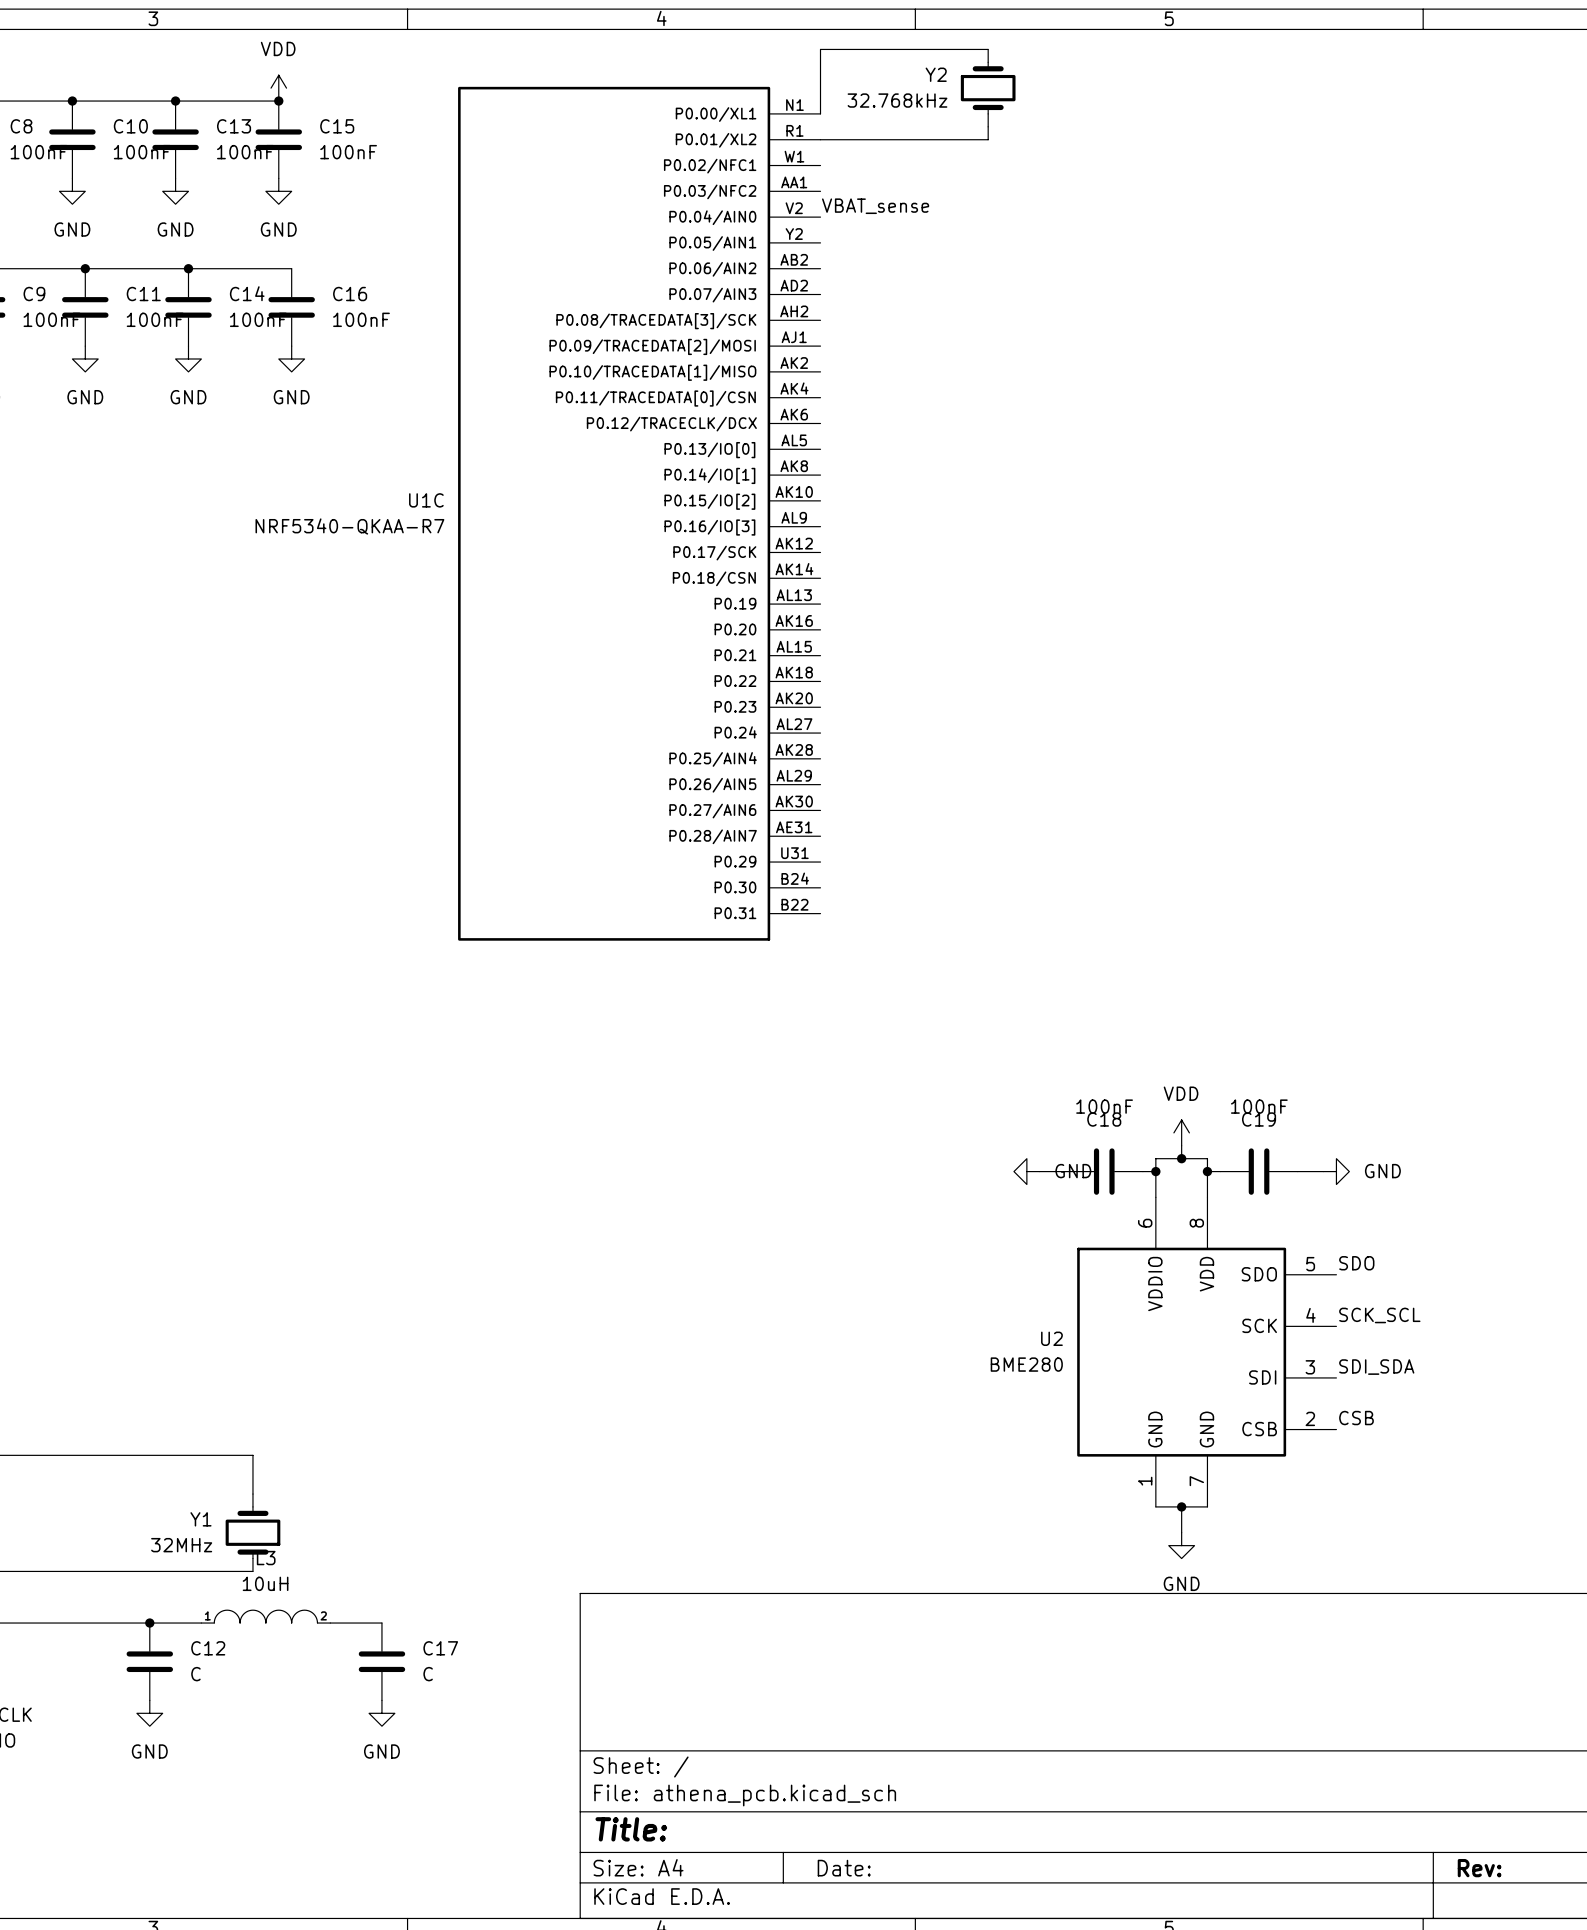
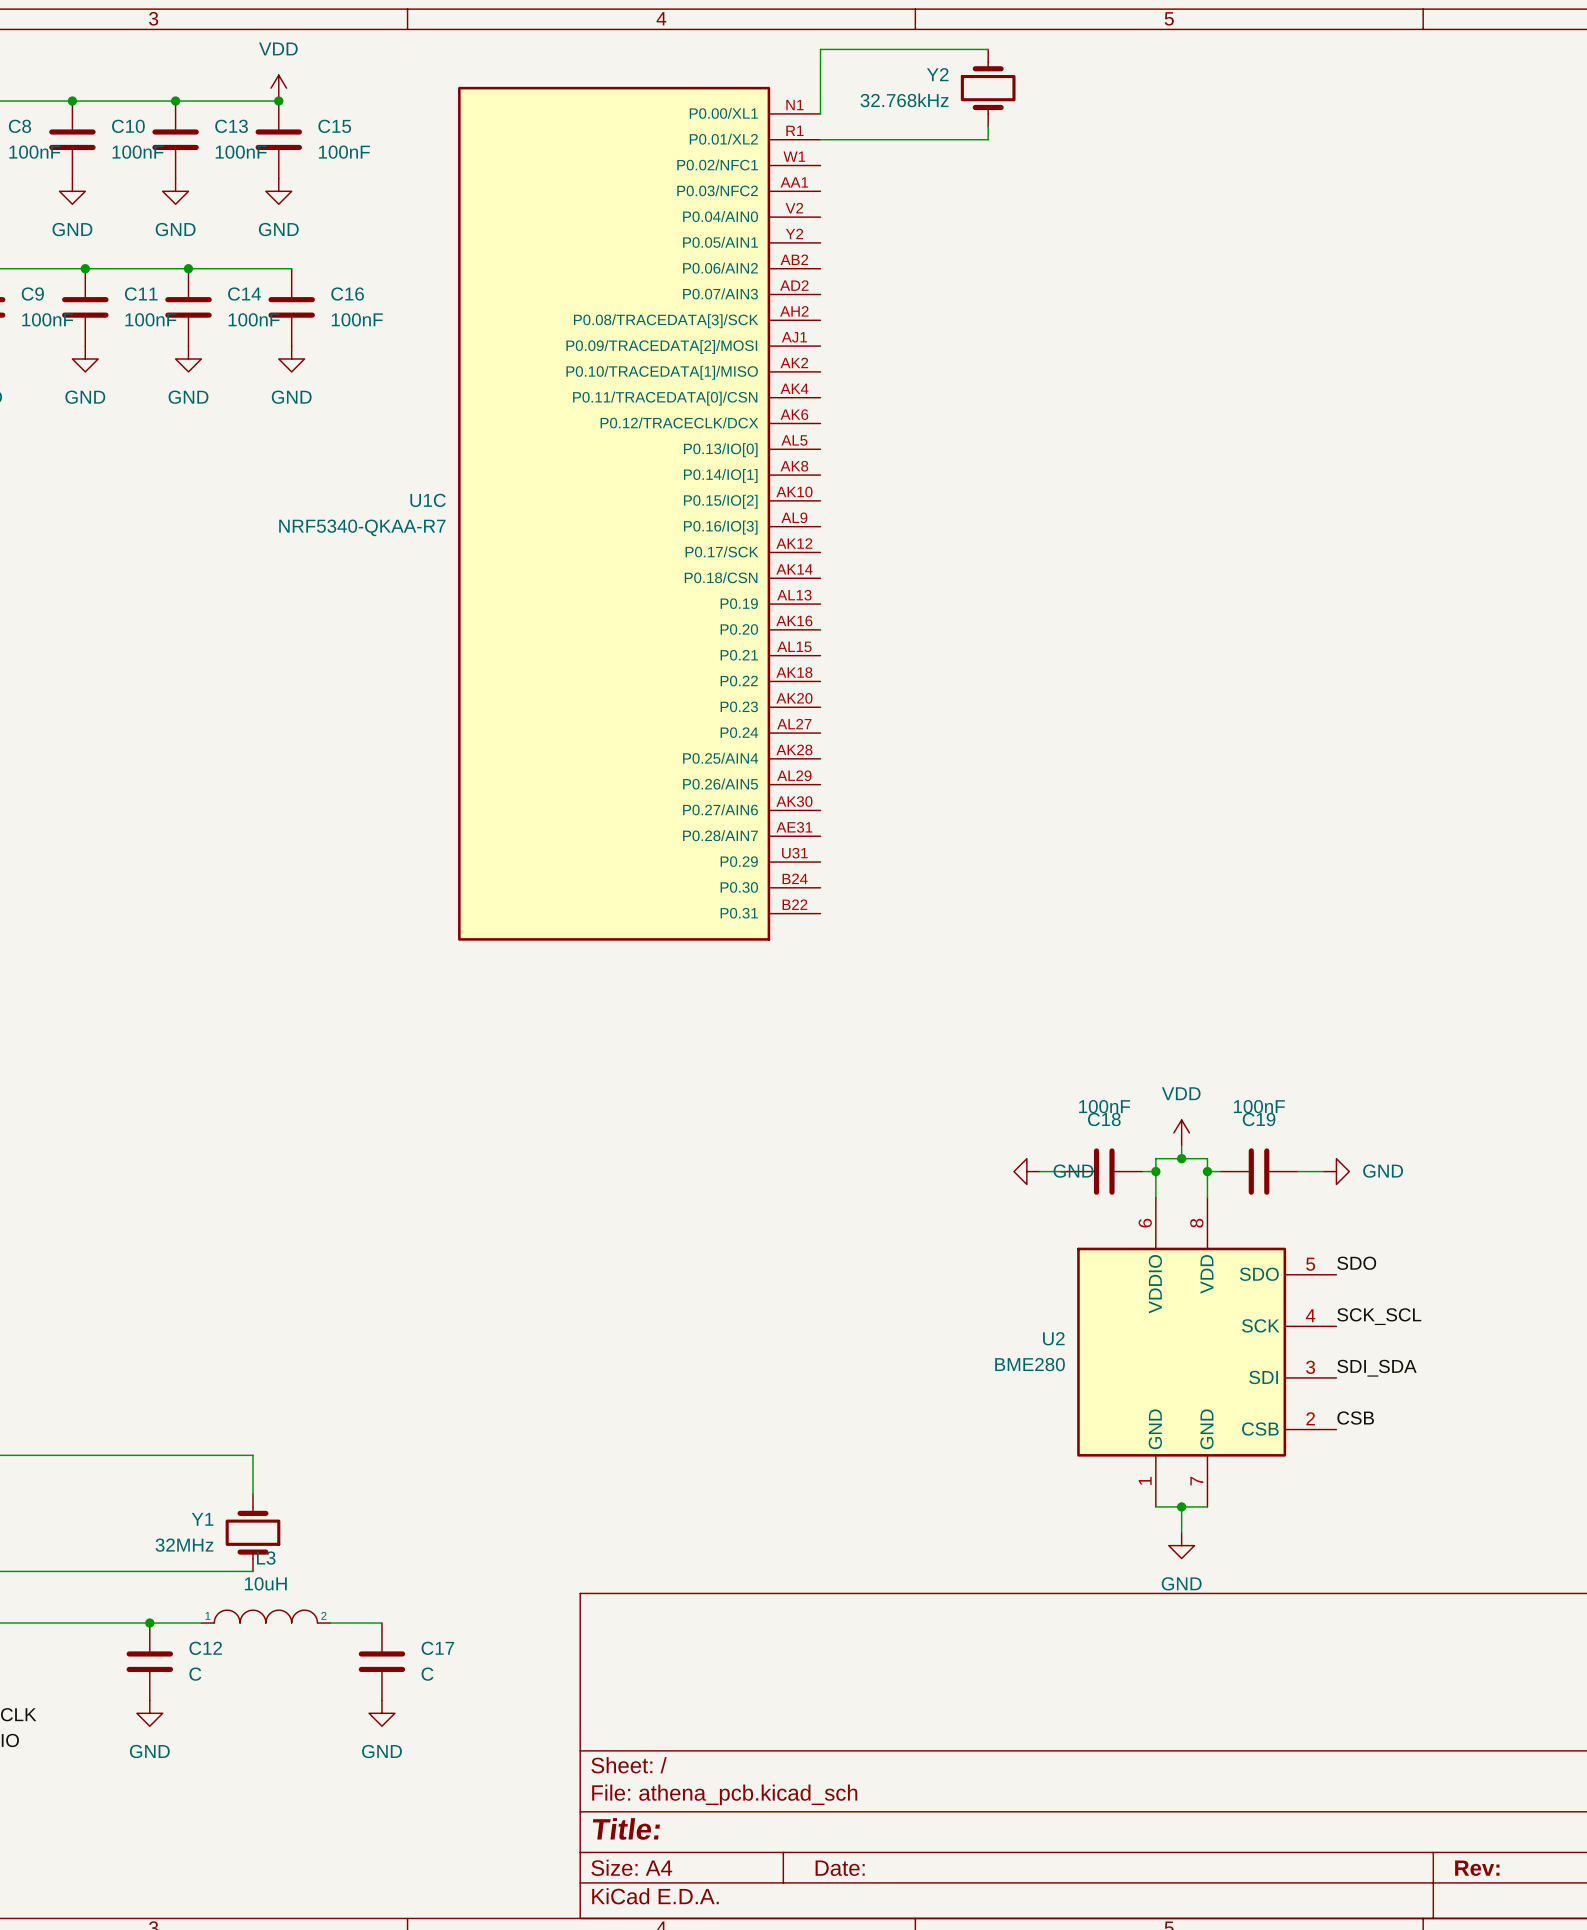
label: VBAT_sense (875, 206) -> none

